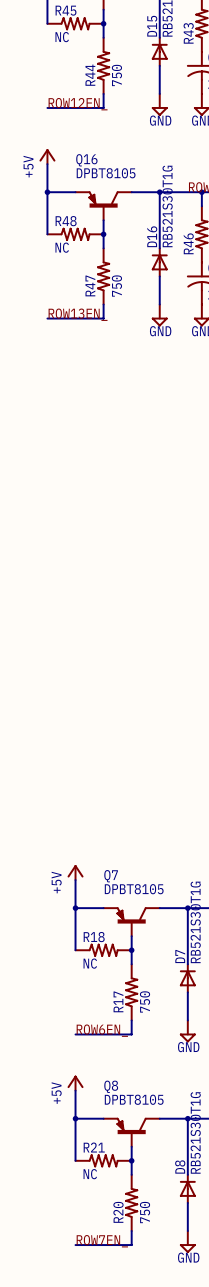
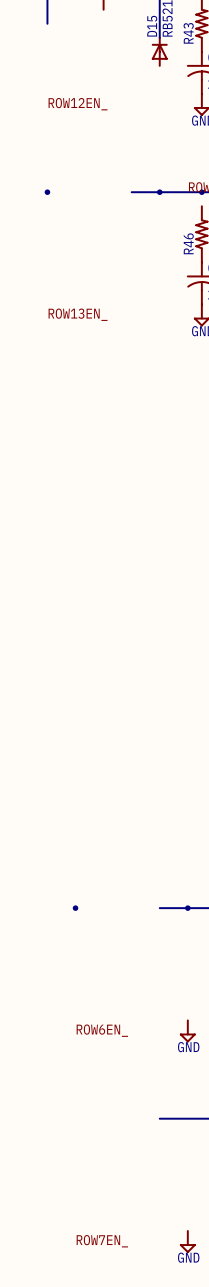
wire: (103, 9) (103, 37) -> none
R45: NC (75, 23) -> none
junction: (103, 23) -> none
R44: 750 (103, 65) -> none
wire: (159, 65) (159, 93) -> none
wire: (103, 93) (103, 107) (47, 107) -> none
power symbol: GND (159, 104) -> none
power symbol: +5V (47, 156) -> none
wire: (47, 164) (47, 234) -> none
wire: (47, 192) (75, 192) -> none
wire: (159, 192) (159, 248) -> none
wire: (201, 192) (201, 206) -> none
Q16: DPBT8105 (103, 206) -> none
wire: (103, 220) (103, 248) -> none
R48: NC (75, 234) -> none
junction: (103, 234) -> none
D16: RB521S30T1G (159, 262) -> none
R47: 750 (103, 276) -> none
wire: (159, 276) (159, 304) -> none
wire: (103, 304) (103, 318) (47, 318) -> none
power symbol: GND (159, 315) -> none
power symbol: +5V (75, 872) -> none
wire: (75, 880) (75, 950) -> none
wire: (75, 908) (103, 908) -> none
wire: (187, 908) (187, 964) -> none
Q7: DPBT8105 (131, 921) -> none
wire: (131, 936) (131, 964) -> none
R18: NC (103, 950) -> none
junction: (131, 950) -> none
D7: RB521S30T1G (187, 978) -> none
R17: 750 (131, 992) -> none
wire: (187, 992) (187, 1020) -> none
wire: (131, 1020) (131, 1034) (75, 1034) -> none
power symbol: +5V (75, 1083) -> none
wire: (75, 1090) (75, 1160) -> none
wire: (75, 1118) (103, 1118) -> none
junction: (75, 1118) -> none
wire: (187, 1118) (187, 1174) -> none
junction: (187, 1118) -> none
Q8: DPBT8105 (131, 1132) -> none
wire: (131, 1146) (131, 1174) -> none
R21: NC (103, 1160) -> none
junction: (131, 1160) -> none
D8: RB521S30T1G (187, 1188) -> none
R20: 750 (131, 1202) -> none
wire: (187, 1202) (187, 1231) -> none
wire: (131, 1231) (131, 1245) (75, 1245) -> none

